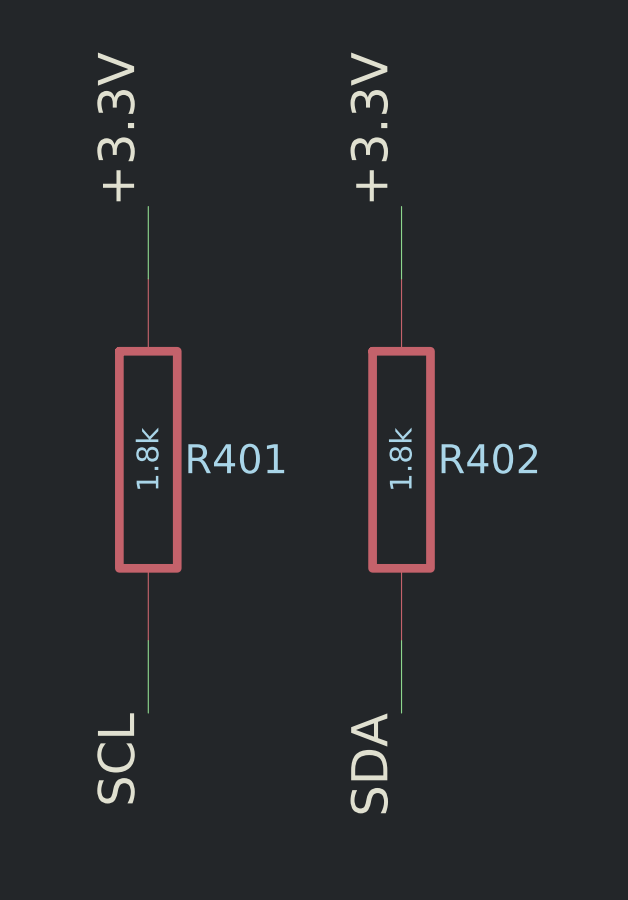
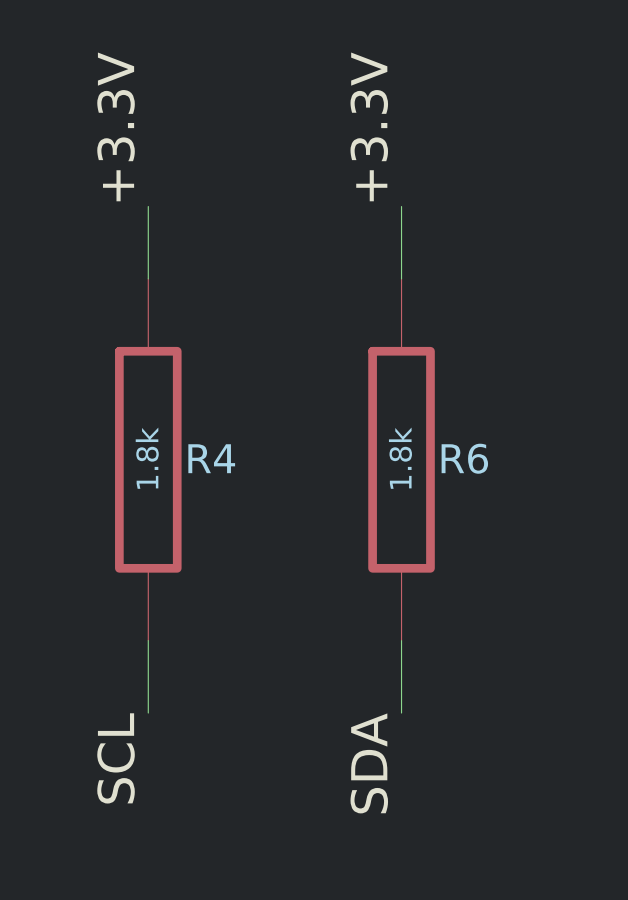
R401 name: R401 (236, 458) -> R4 (211, 458)
R402 name: R402 (489, 458) -> R6 (464, 458)

